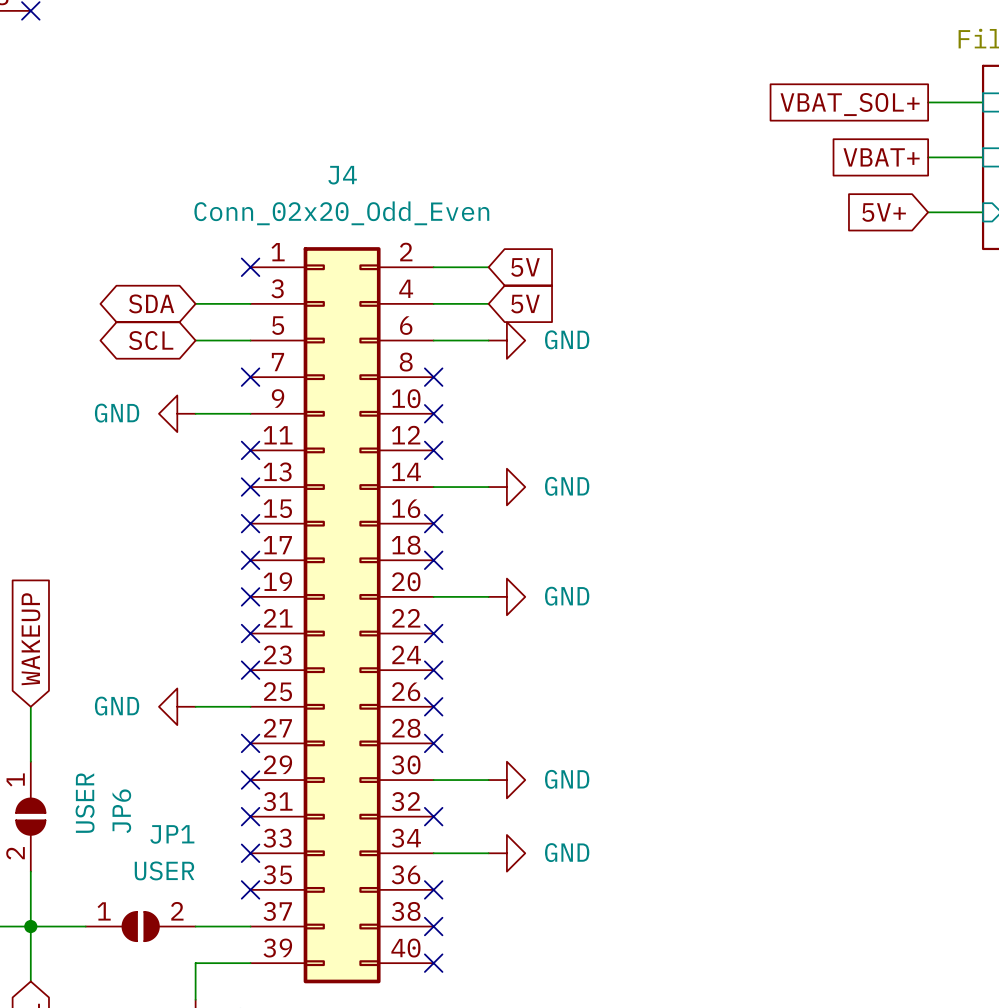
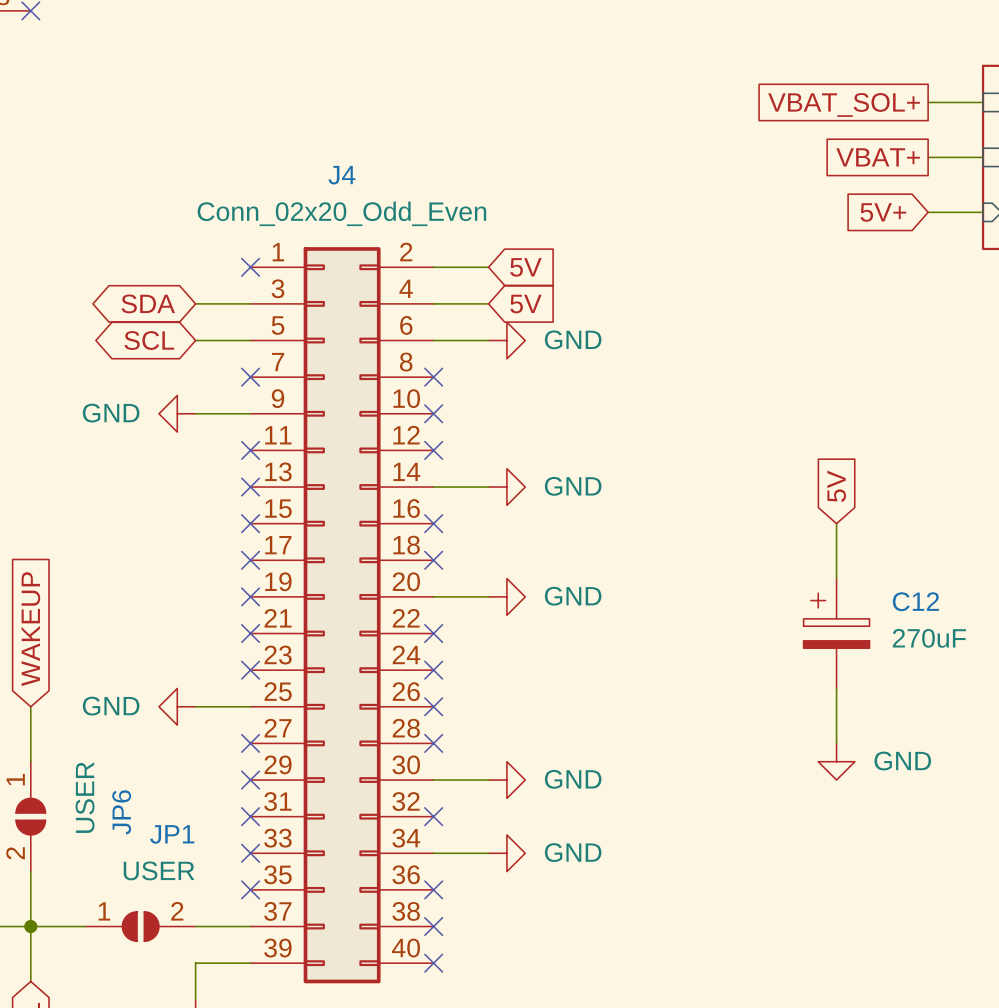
global label: none -> 5V (836, 486)
wire: none -> (836, 523) (836, 578)
C12: none -> 270uF (836, 633)
wire: none -> (836, 688) (836, 743)
power symbol: none -> GND (836, 761)

